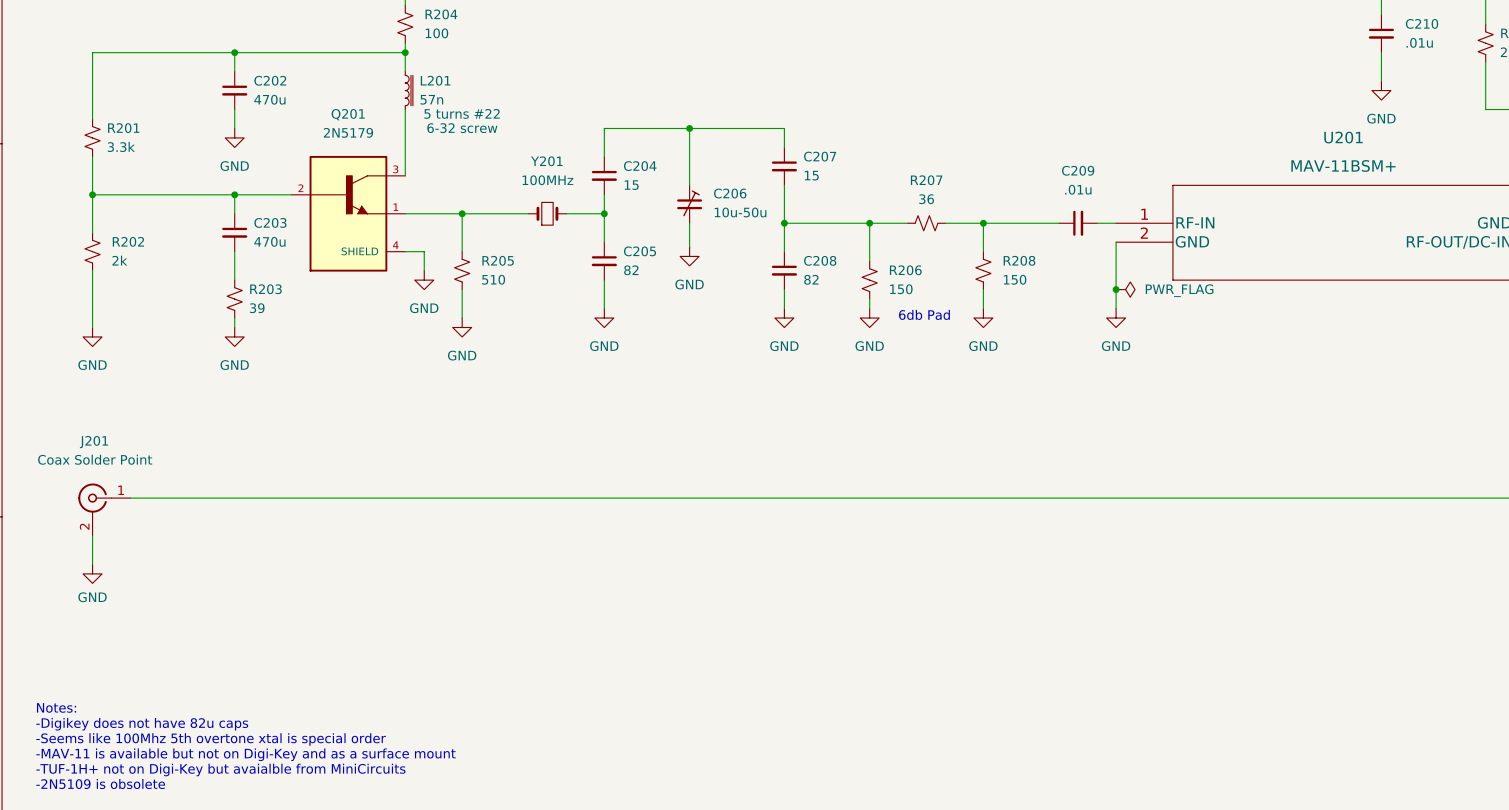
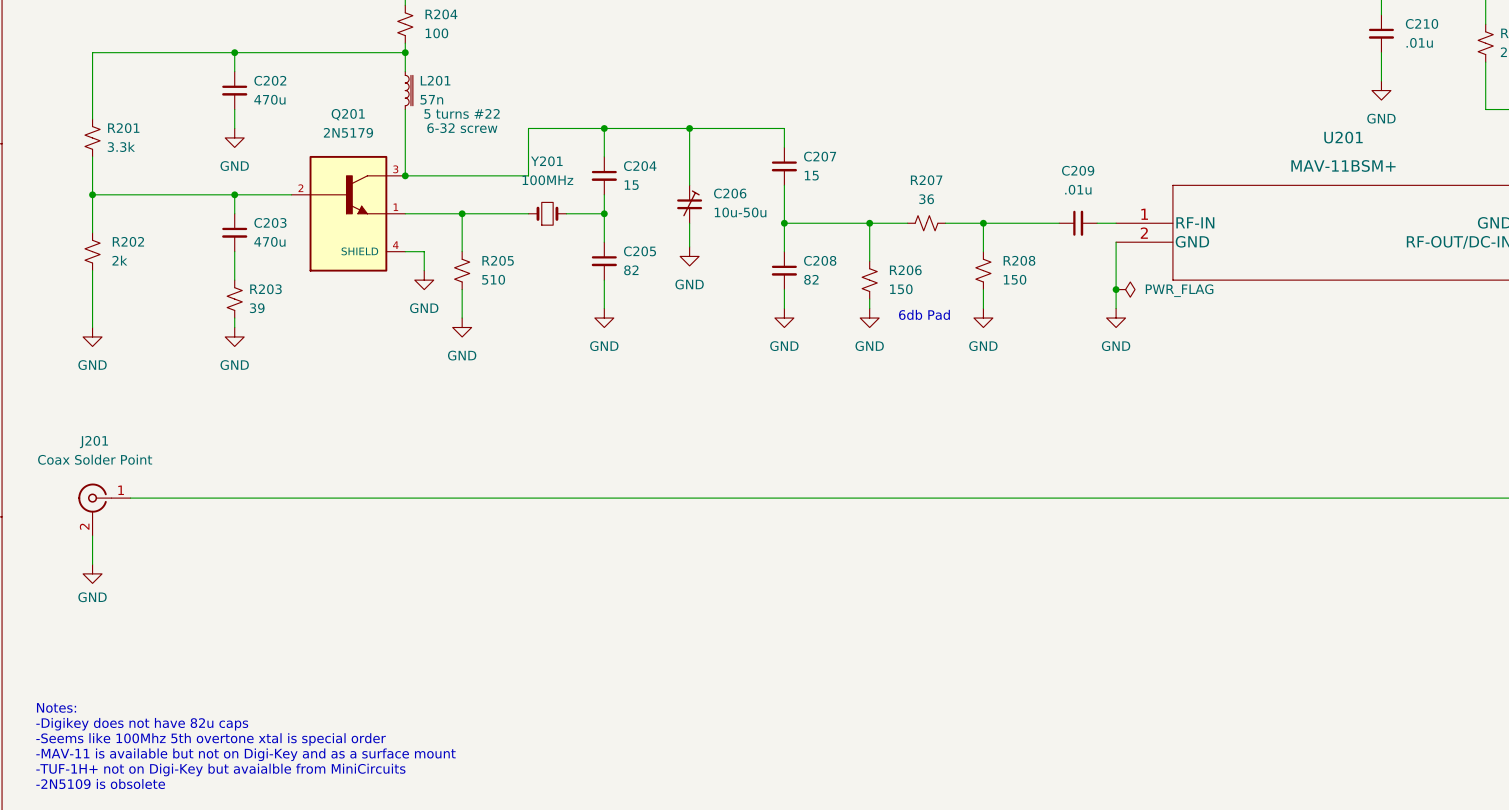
wire: none -> (604, 128) (528, 128) (528, 175) (405, 175)
junction: none -> (604, 128)
junction: none -> (405, 175)

